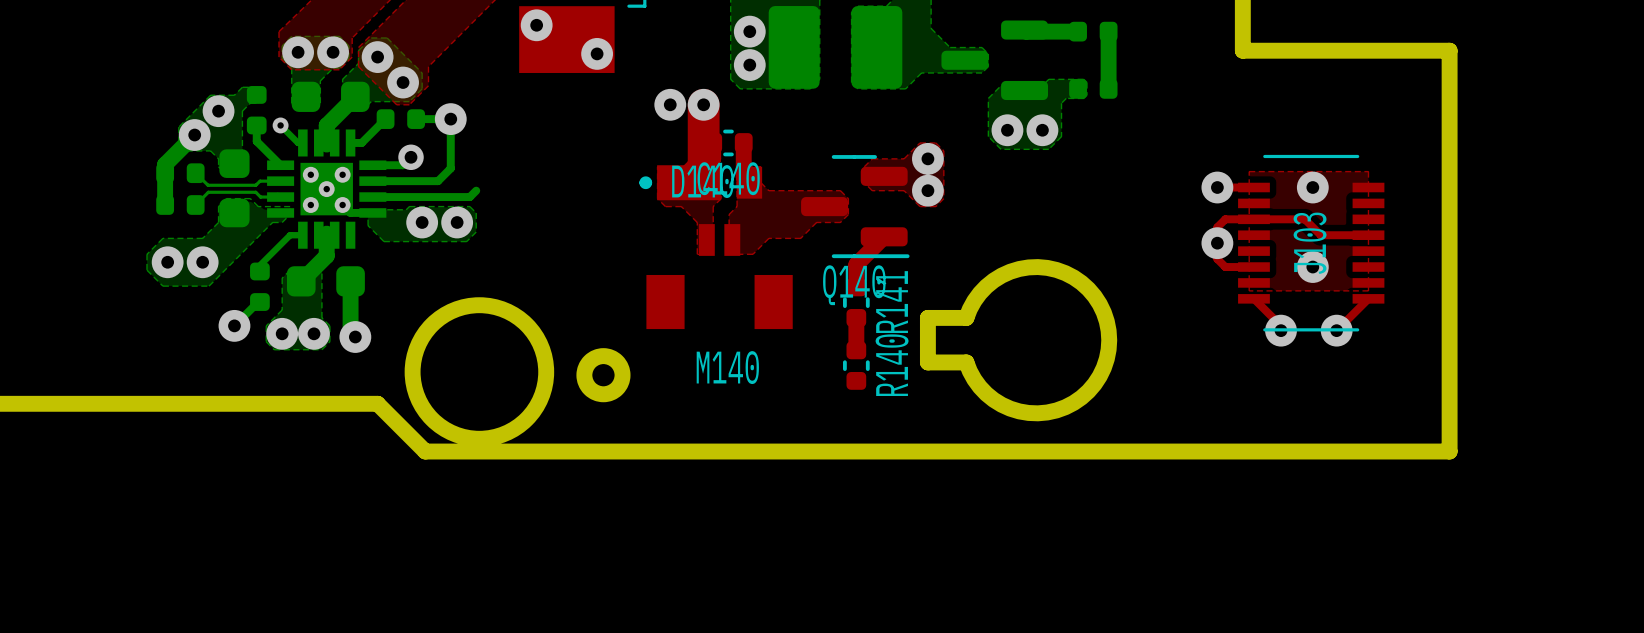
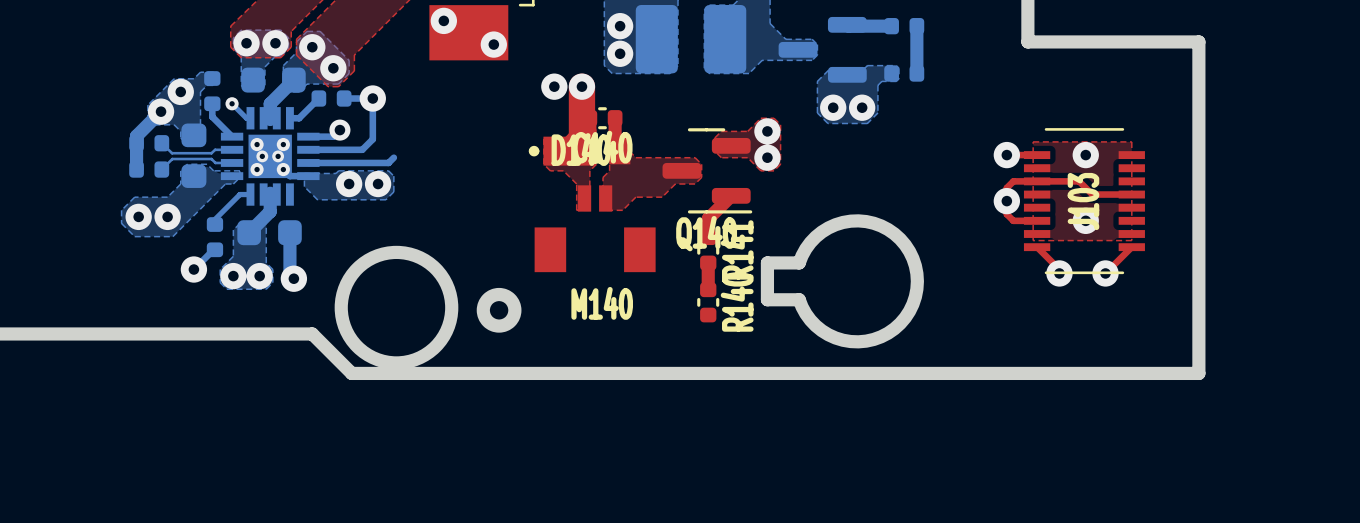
via: none -> (262, 156)
via: (326, 189) -> none
via: none -> (278, 156)

